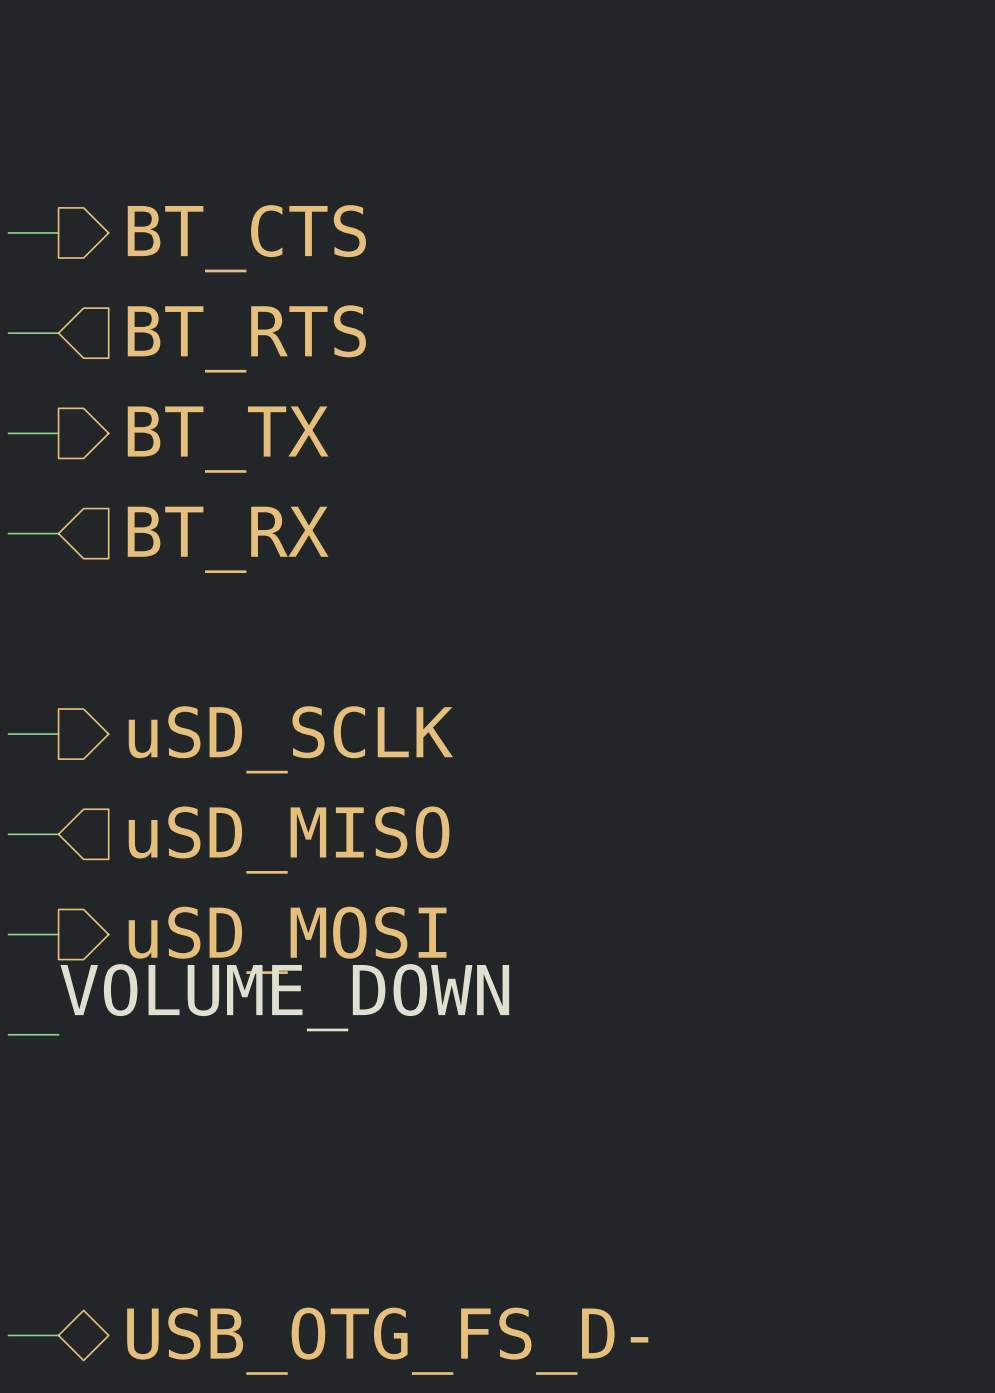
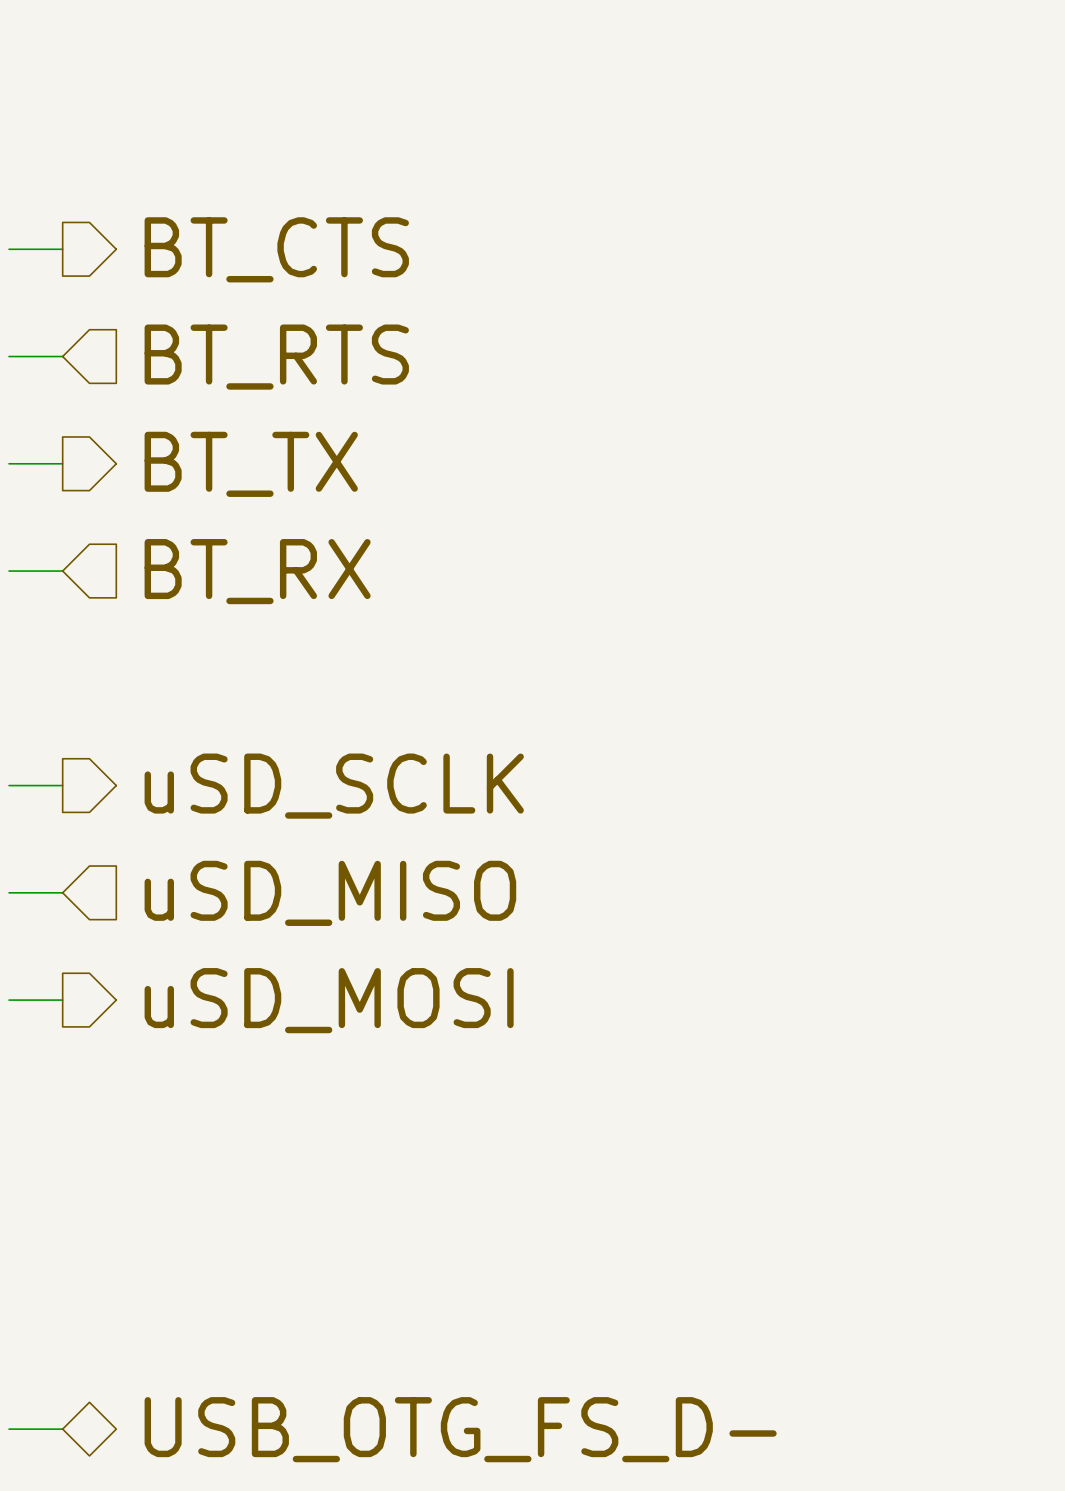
label: VOLUME_DOWN (284, 997) -> none
wire: (8, 1034) (58, 1034) -> none

